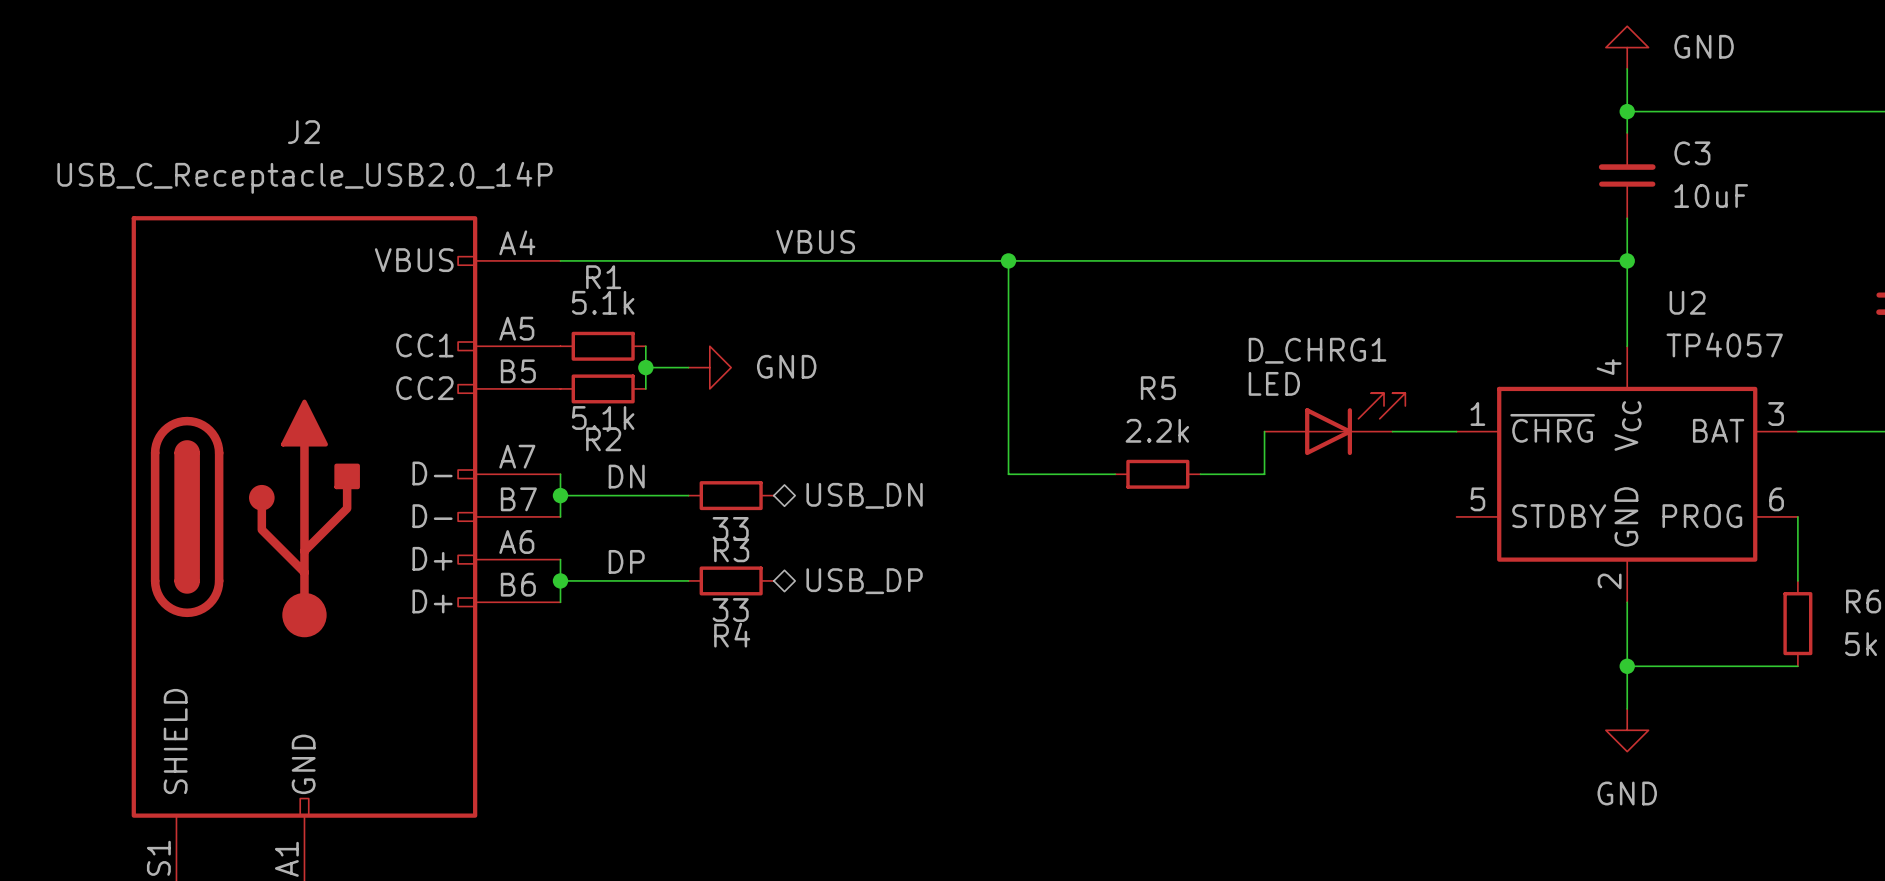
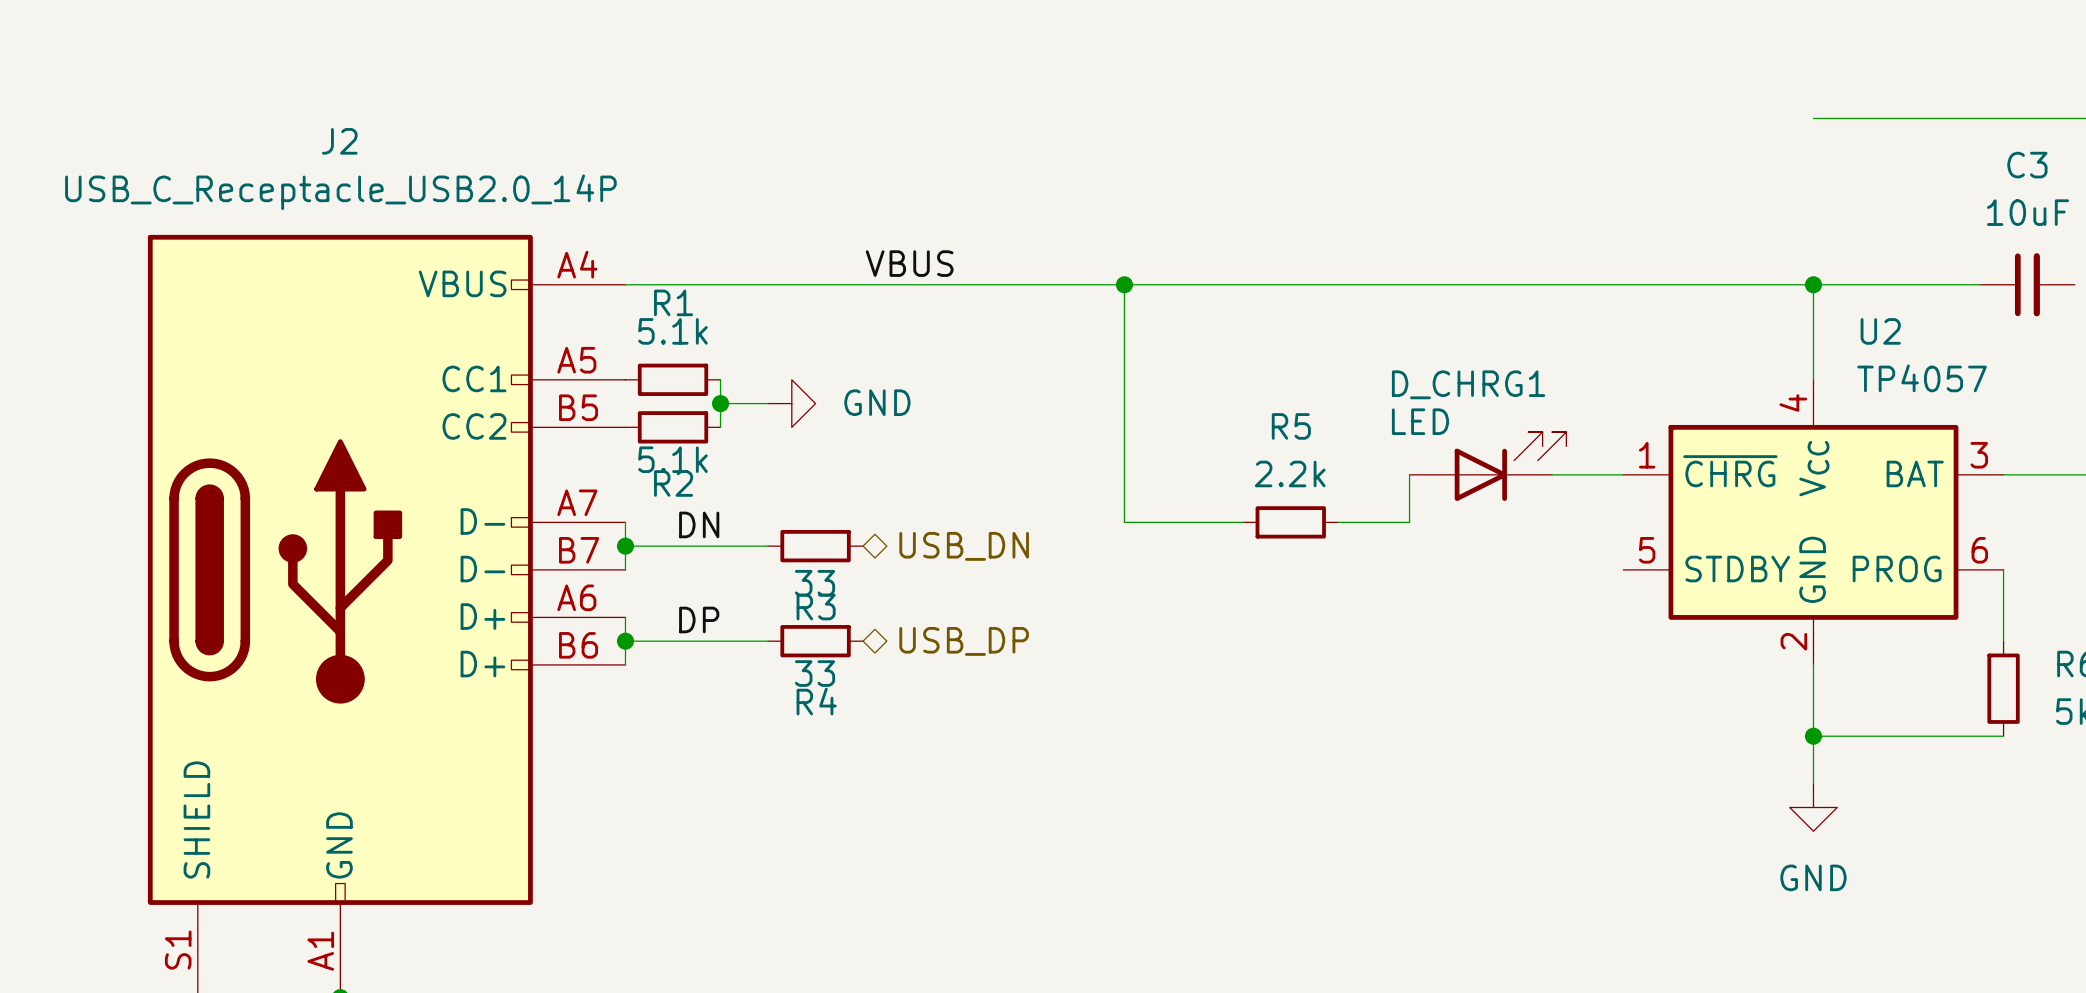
power symbol: GND (1627, 47) -> none
wire: (1627, 68) (1627, 132) -> none
junction: (1627, 111) -> none
C3 name position: C3 (1692, 153) -> C3 (2027, 165)
C3 rotation: 0° (1627, 175) -> 90° clockwise (2027, 284)
C3 position: (1627, 175) -> (2027, 284)
C3 value position: 10uF (1711, 196) -> 10uF (2027, 212)
wire: (1627, 218) (1627, 260) -> (1979, 284) (1813, 284)

